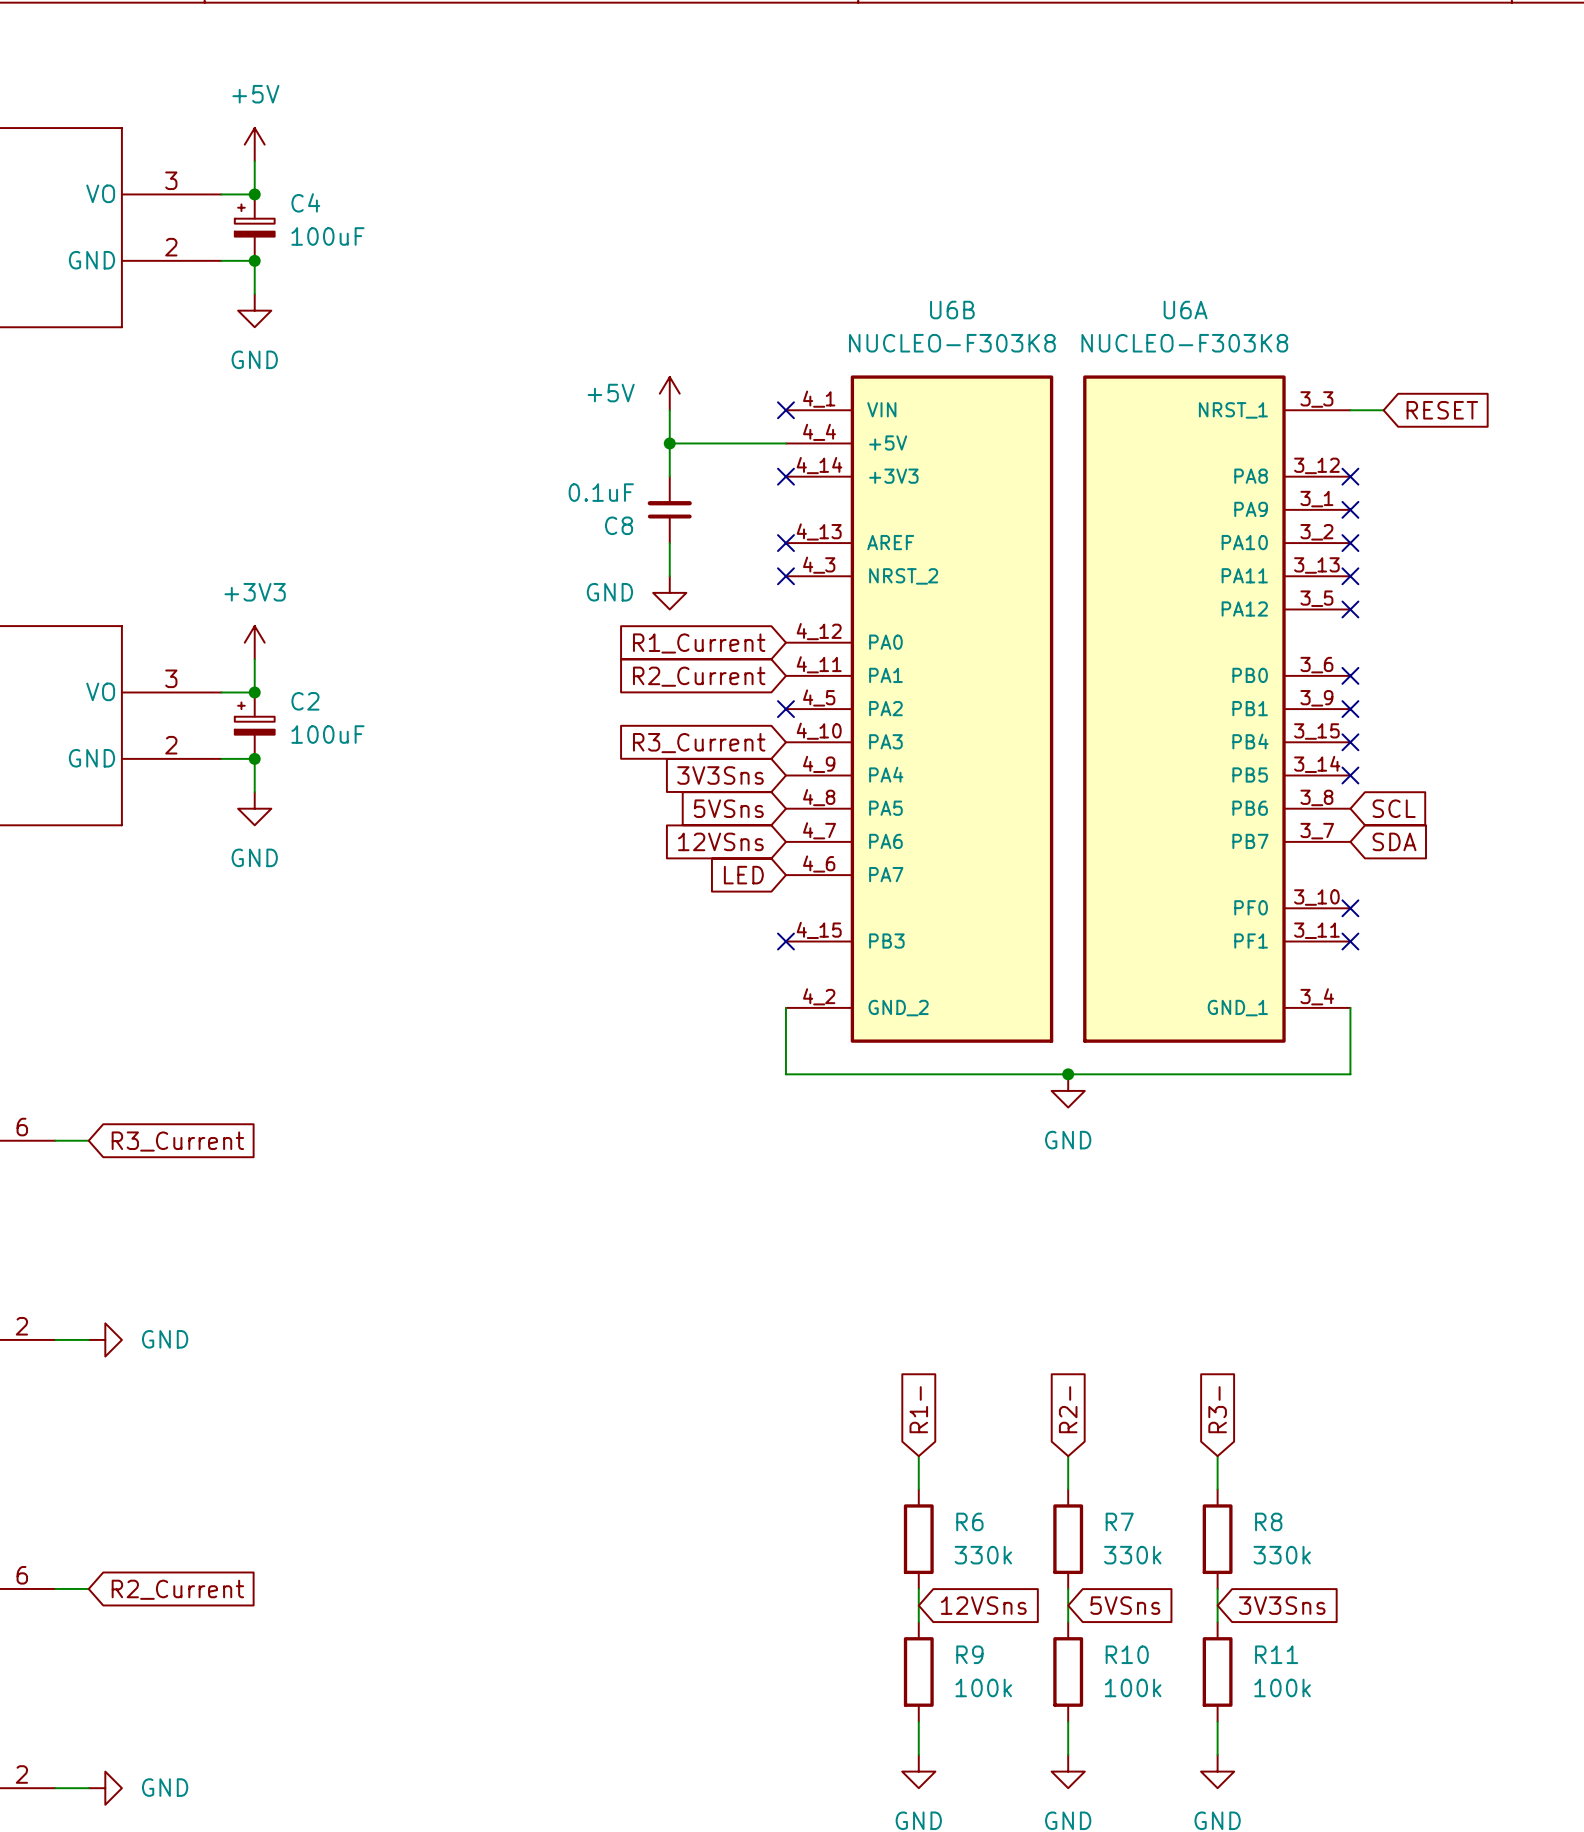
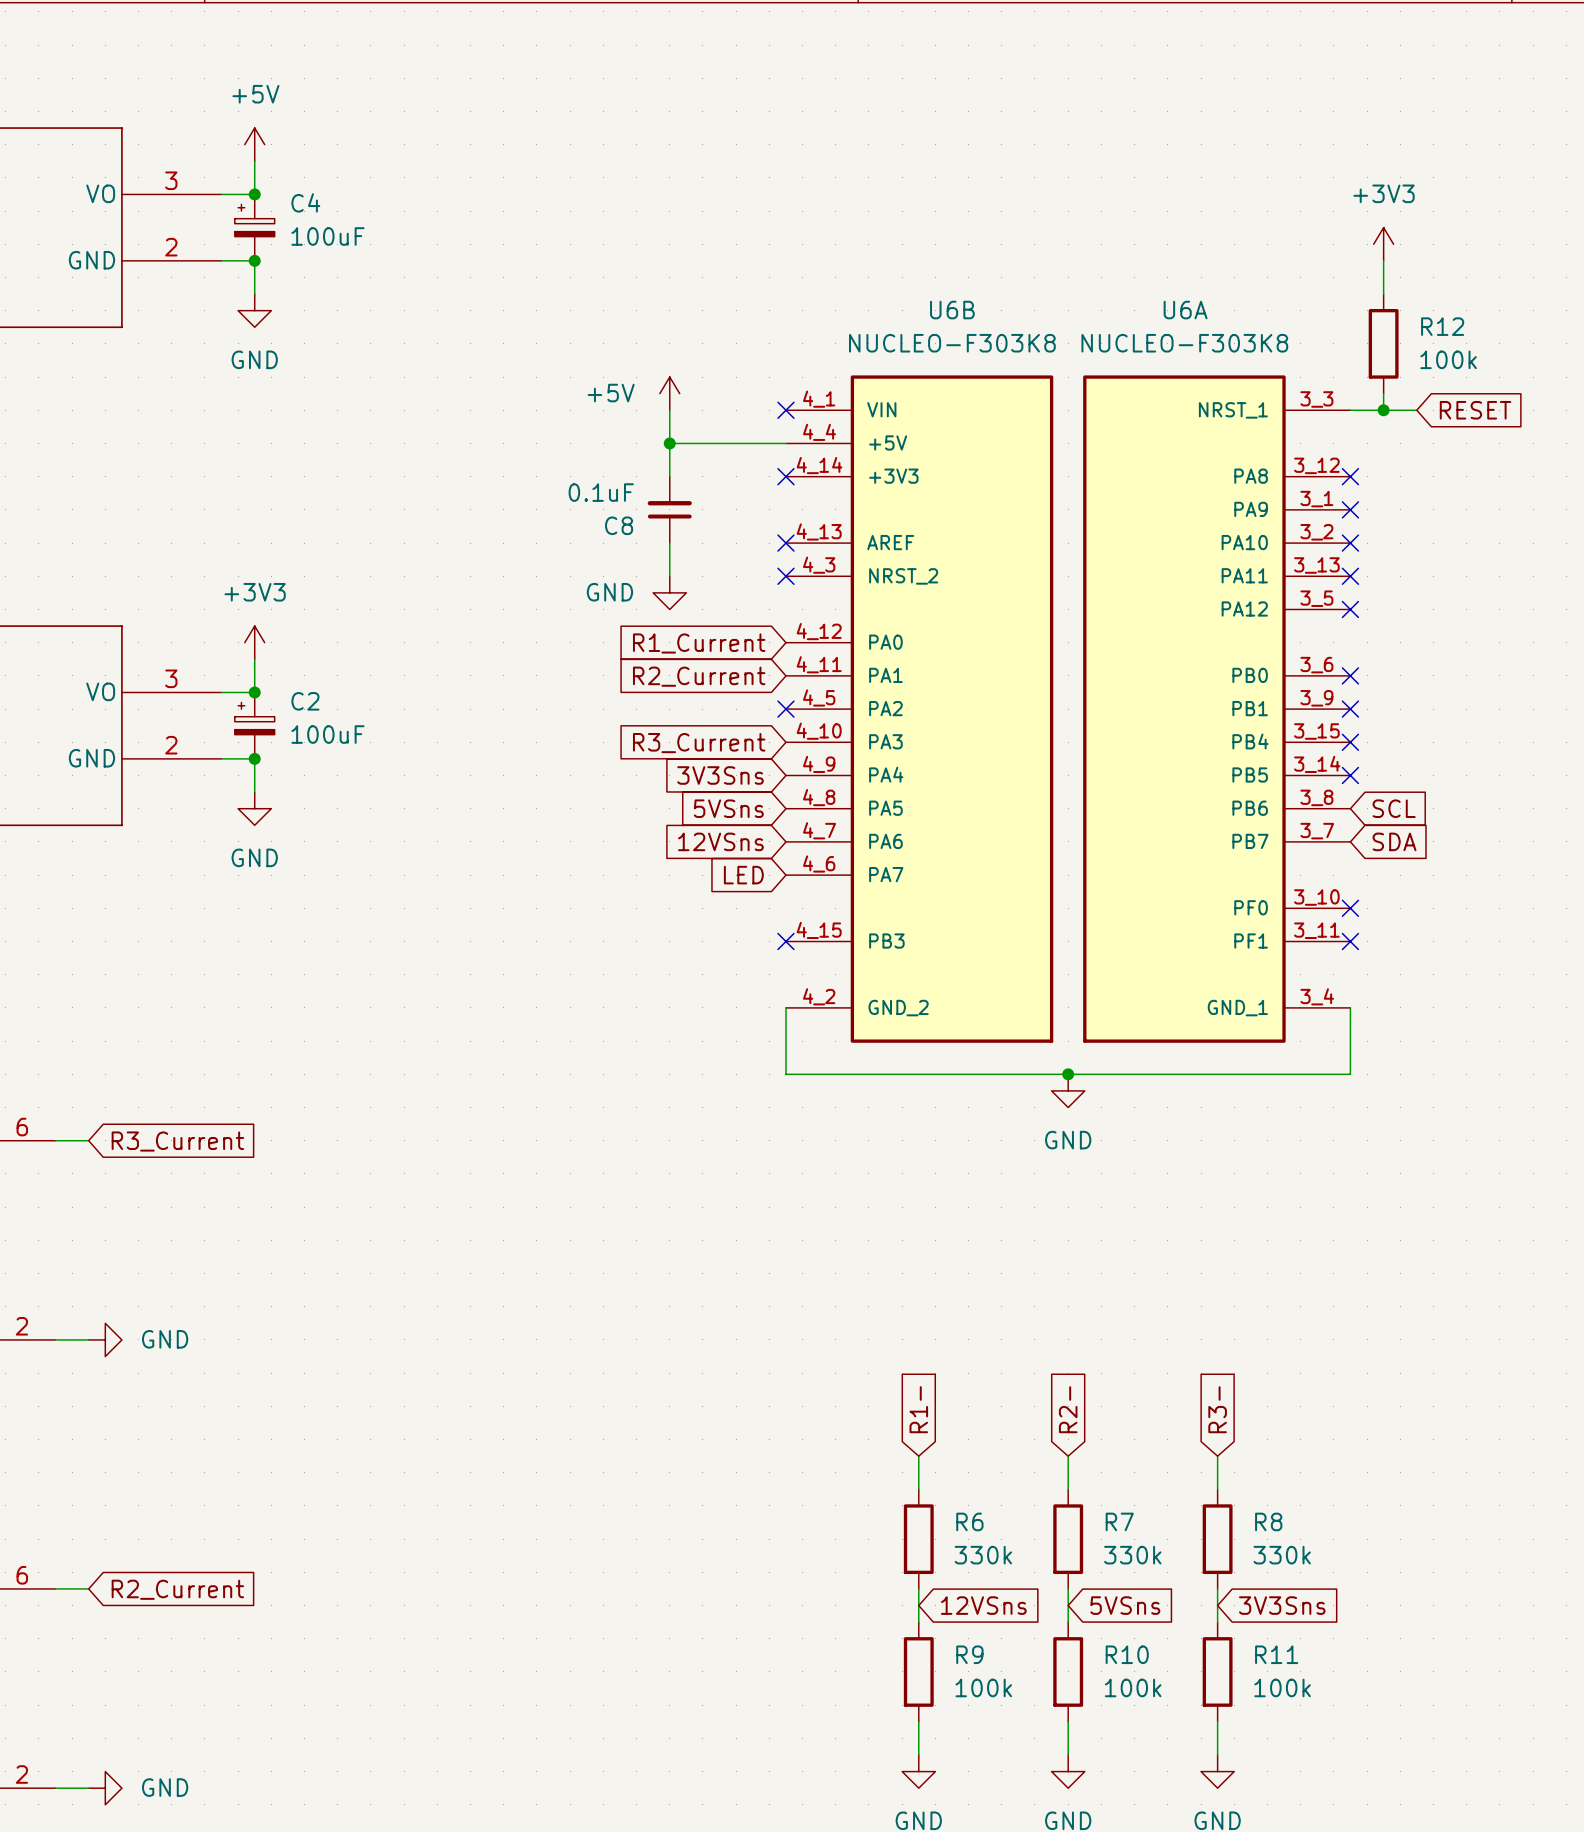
power symbol: none -> +3V3 (1383, 244)
wire: none -> (1383, 260) (1383, 294)
R12: none -> 100k (1383, 343)
wire: none -> (1383, 393) (1383, 410) (1416, 410)
junction: none -> (1383, 410)
global label position: RESET (1442, 410) -> RESET (1475, 410)

